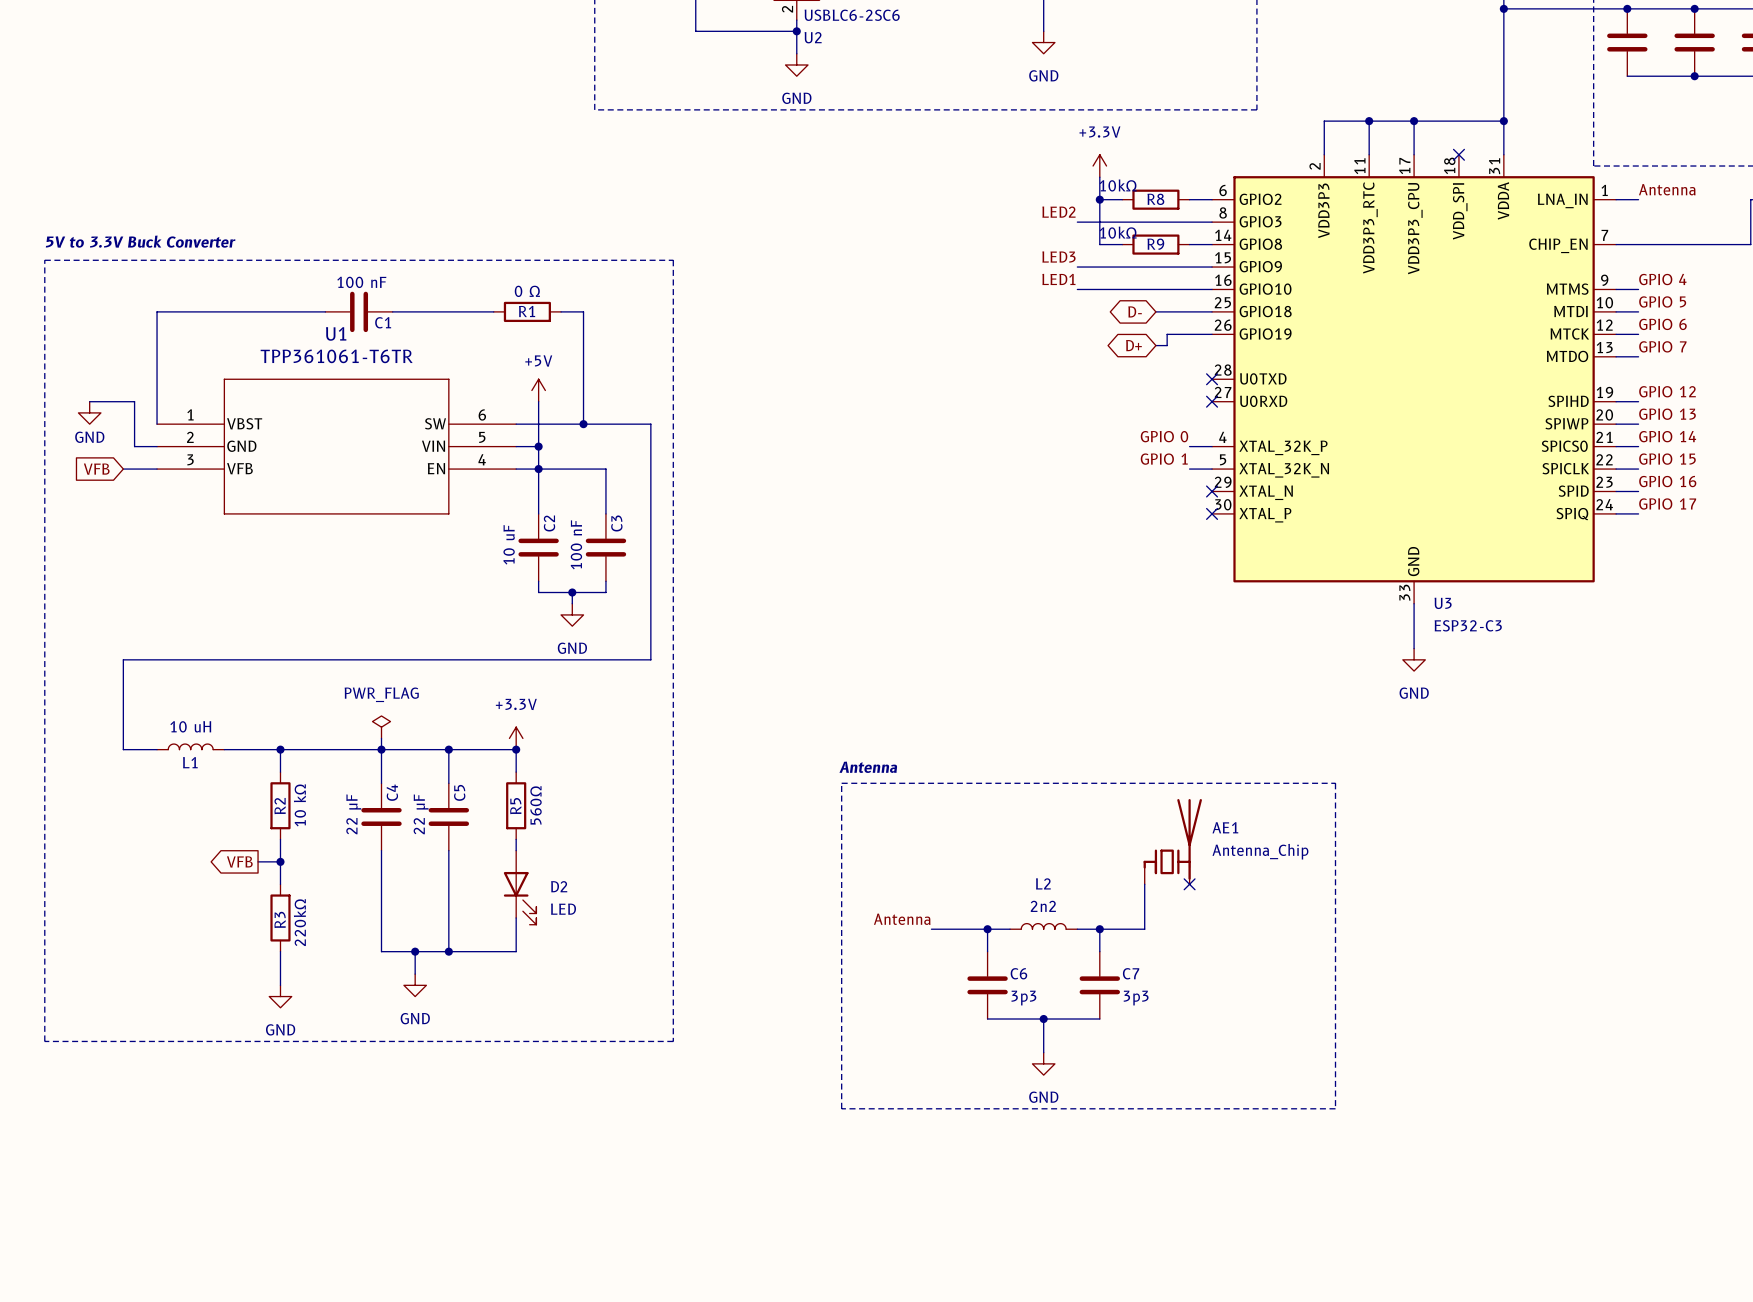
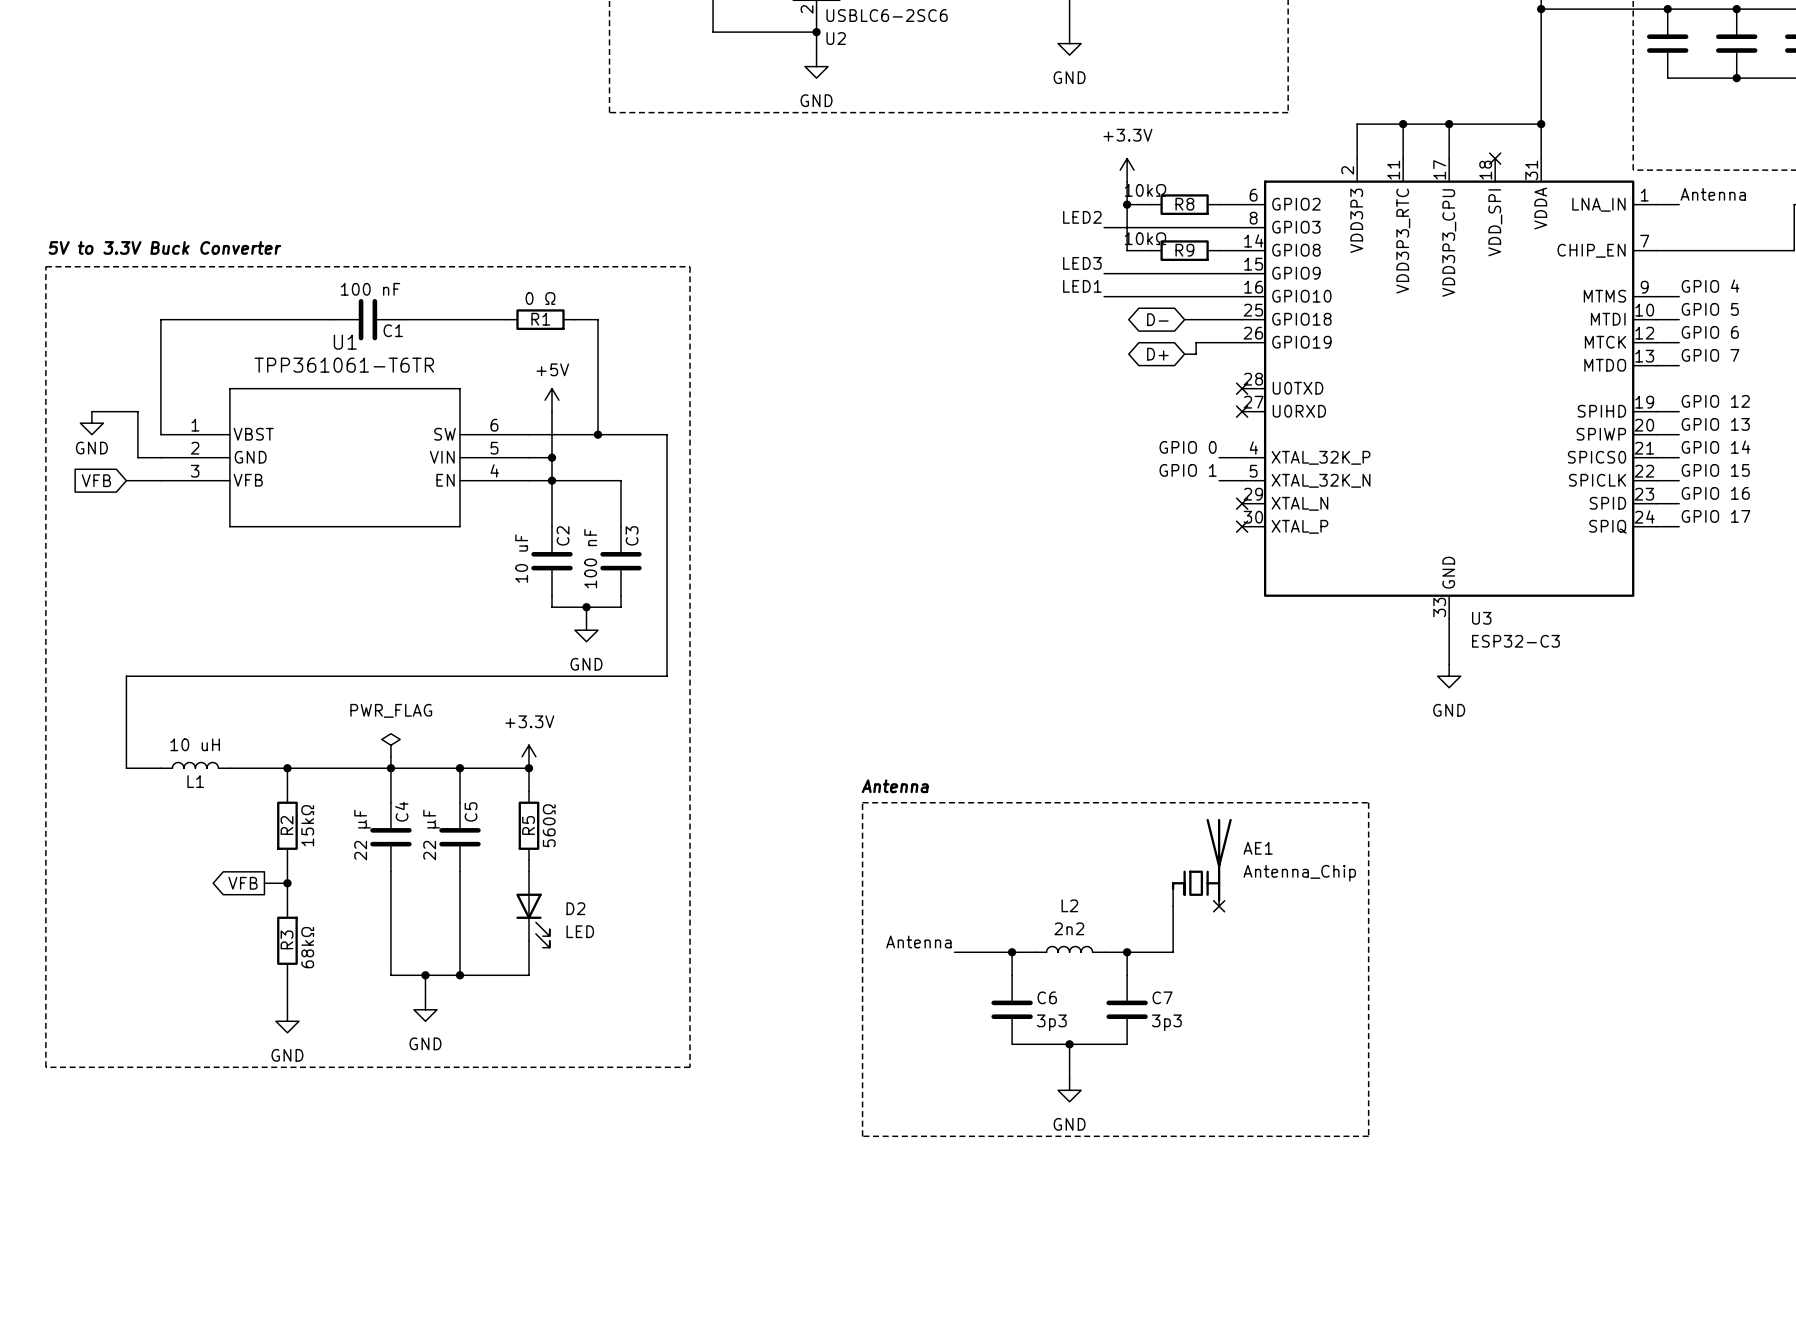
R2 value: 10 kΩ (299, 805) -> 15kΩ (307, 825)
R3 value: 220kΩ (299, 922) -> 68kΩ (307, 947)

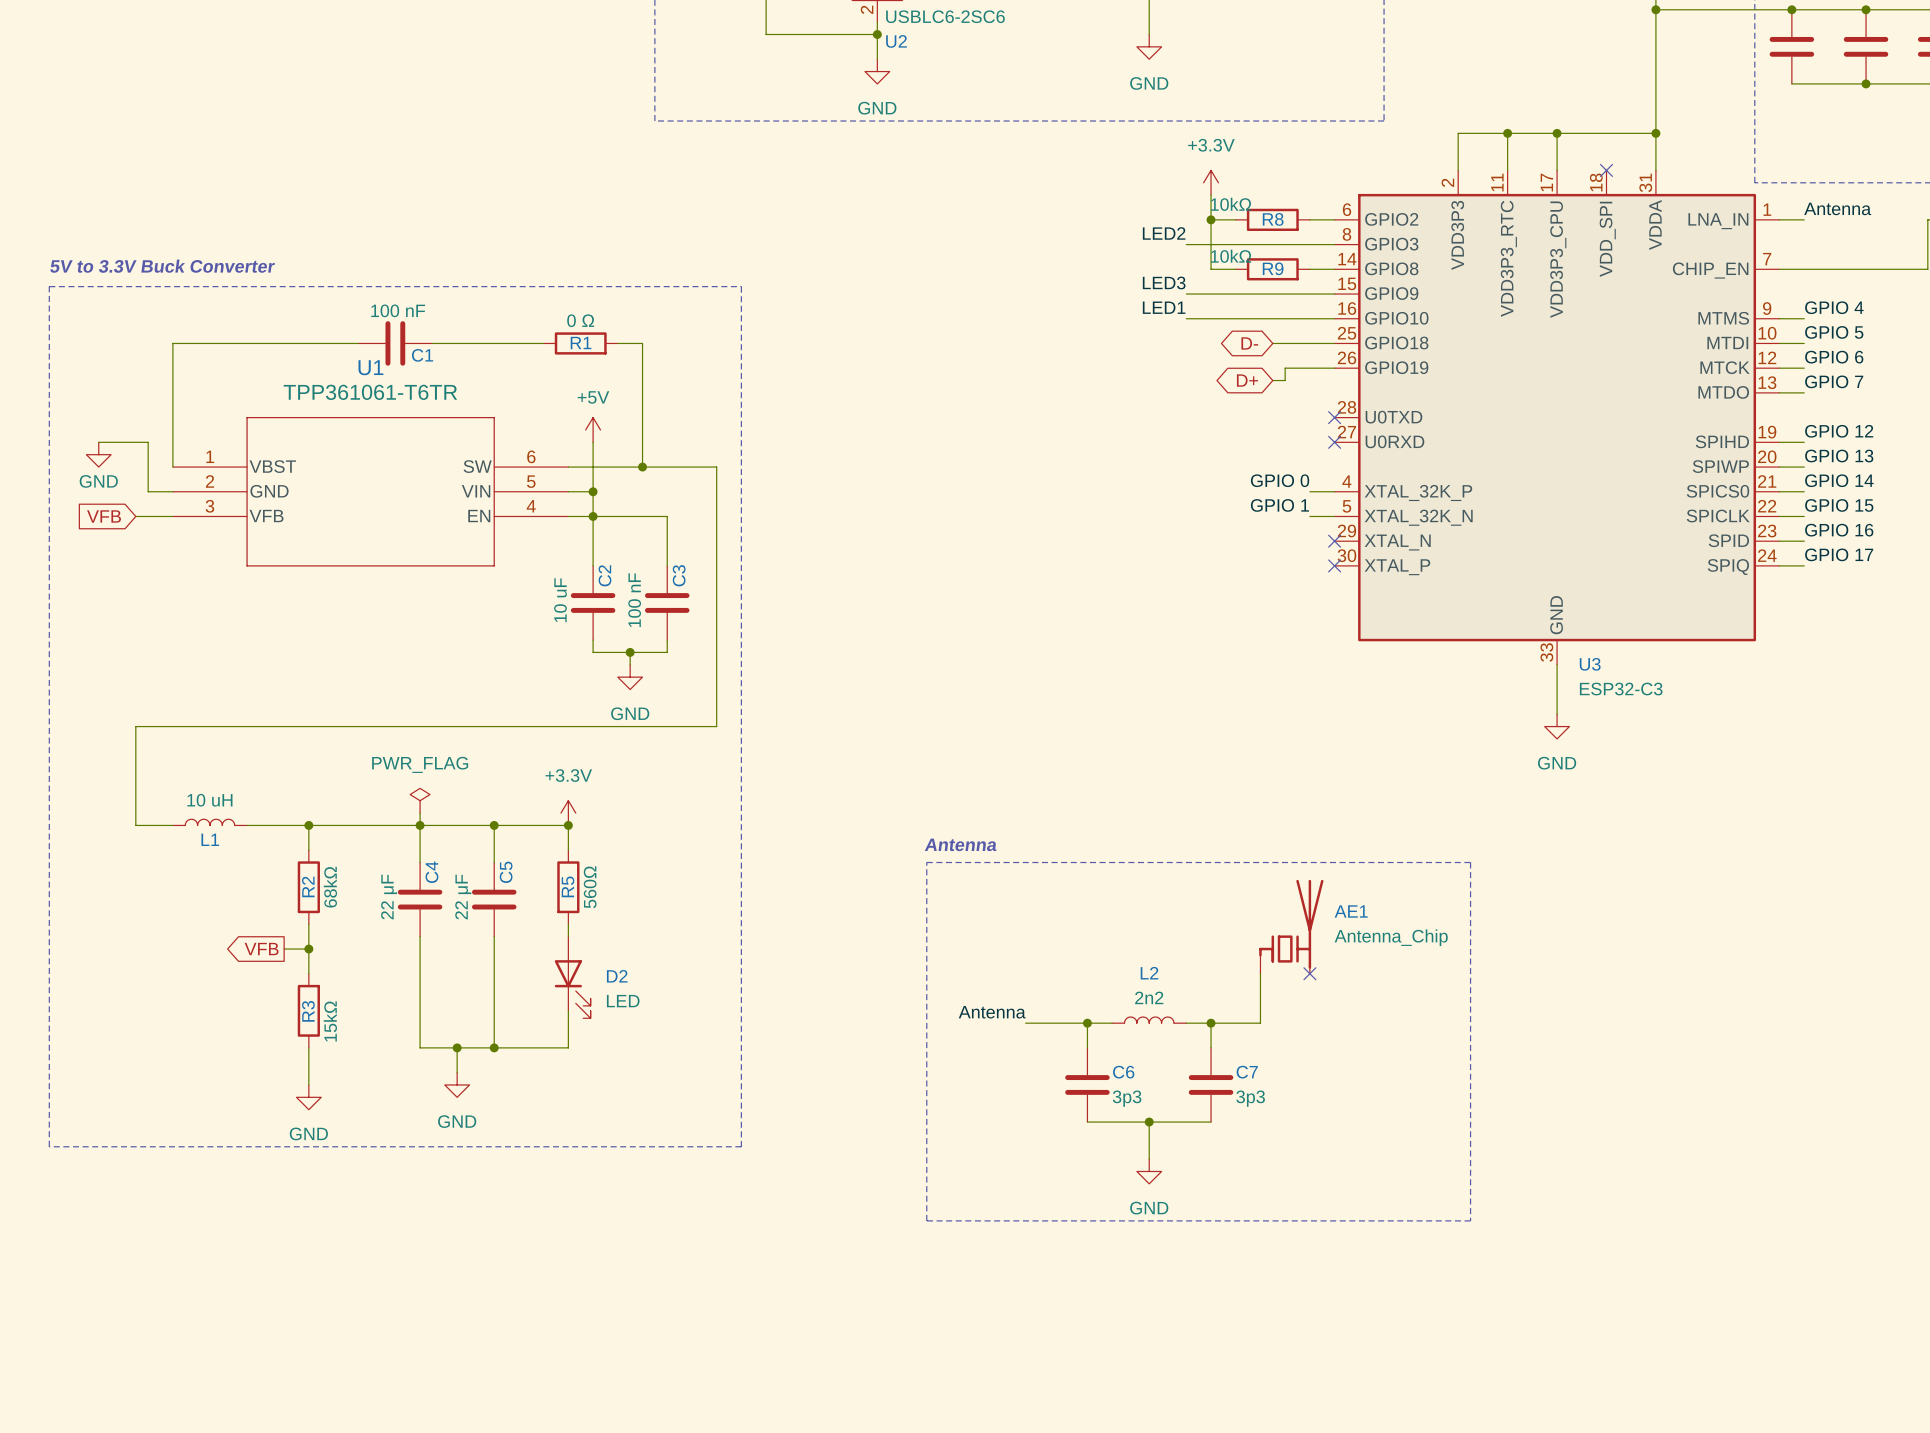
R2 value: 15kΩ (307, 825) -> 68kΩ (330, 887)
R3 value: 68kΩ (307, 947) -> 15kΩ (330, 1021)

